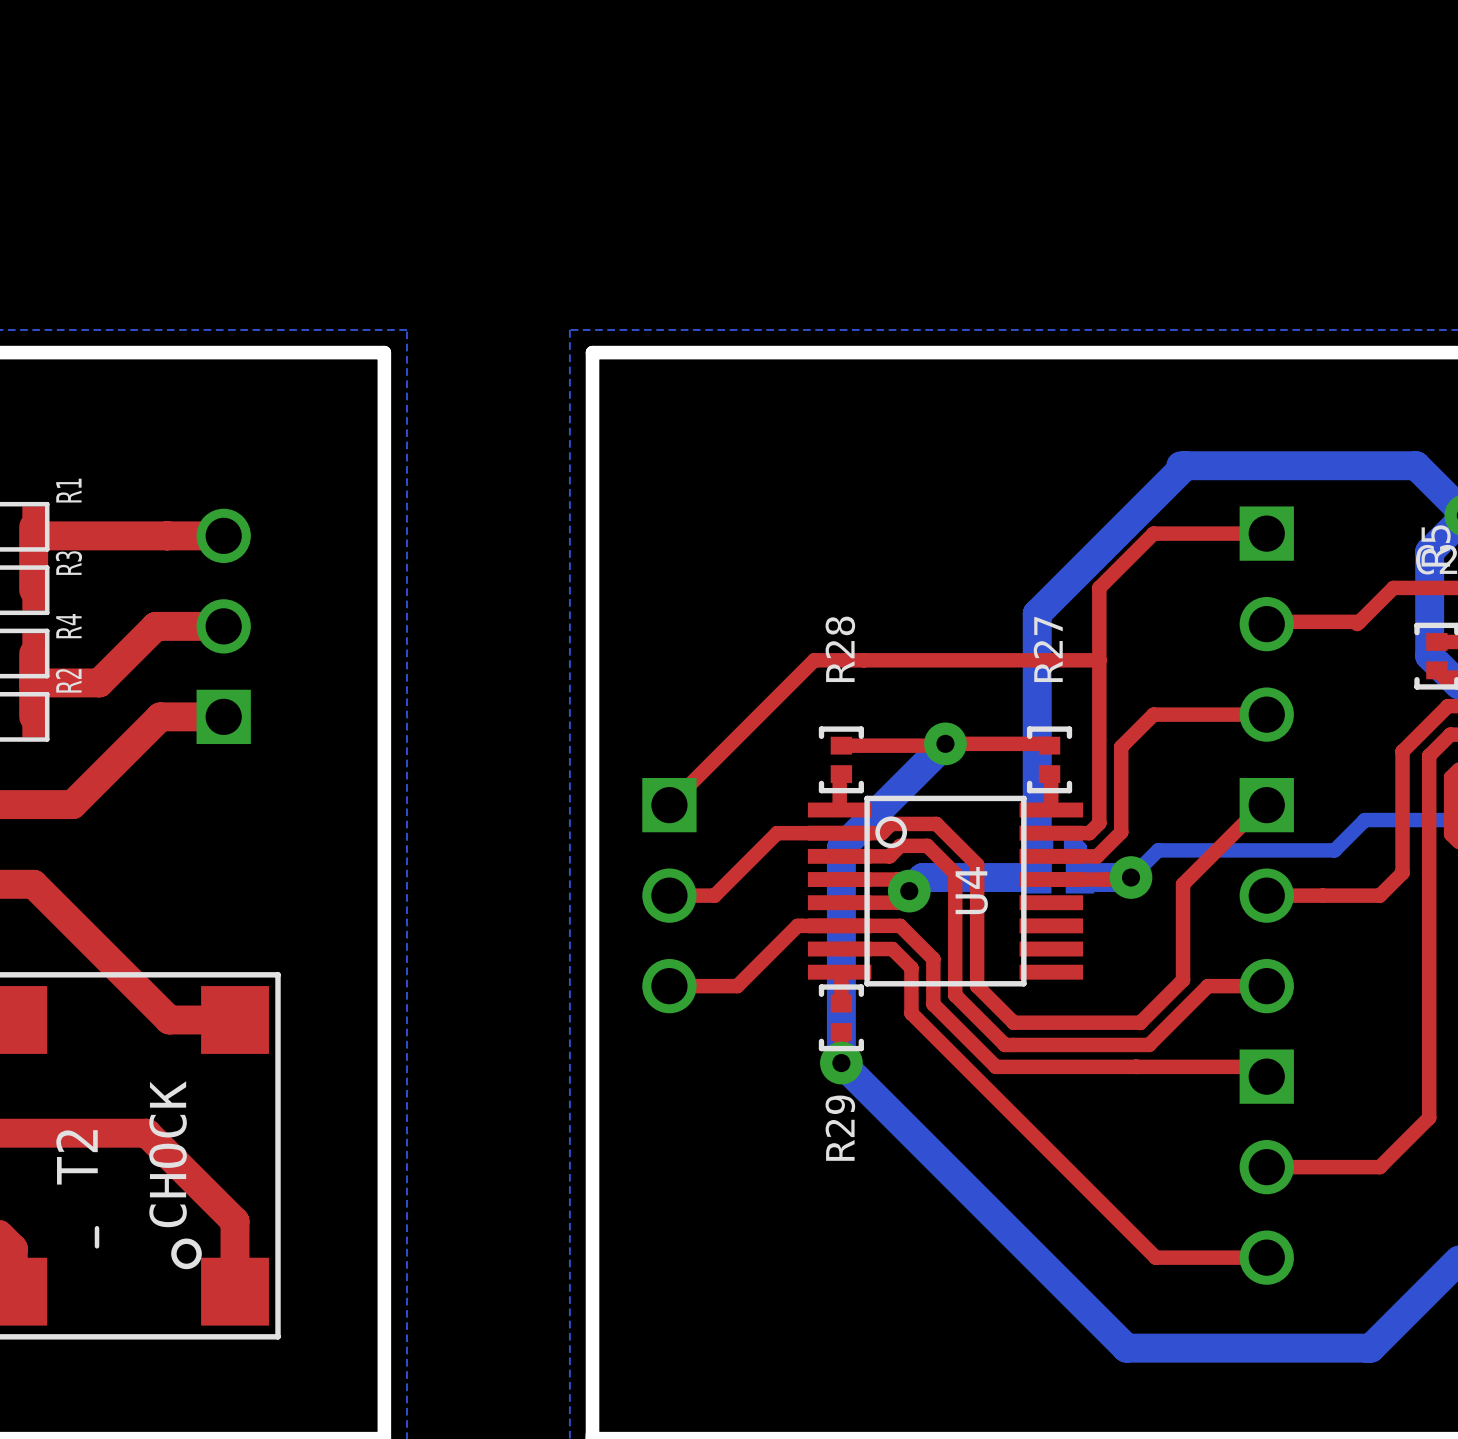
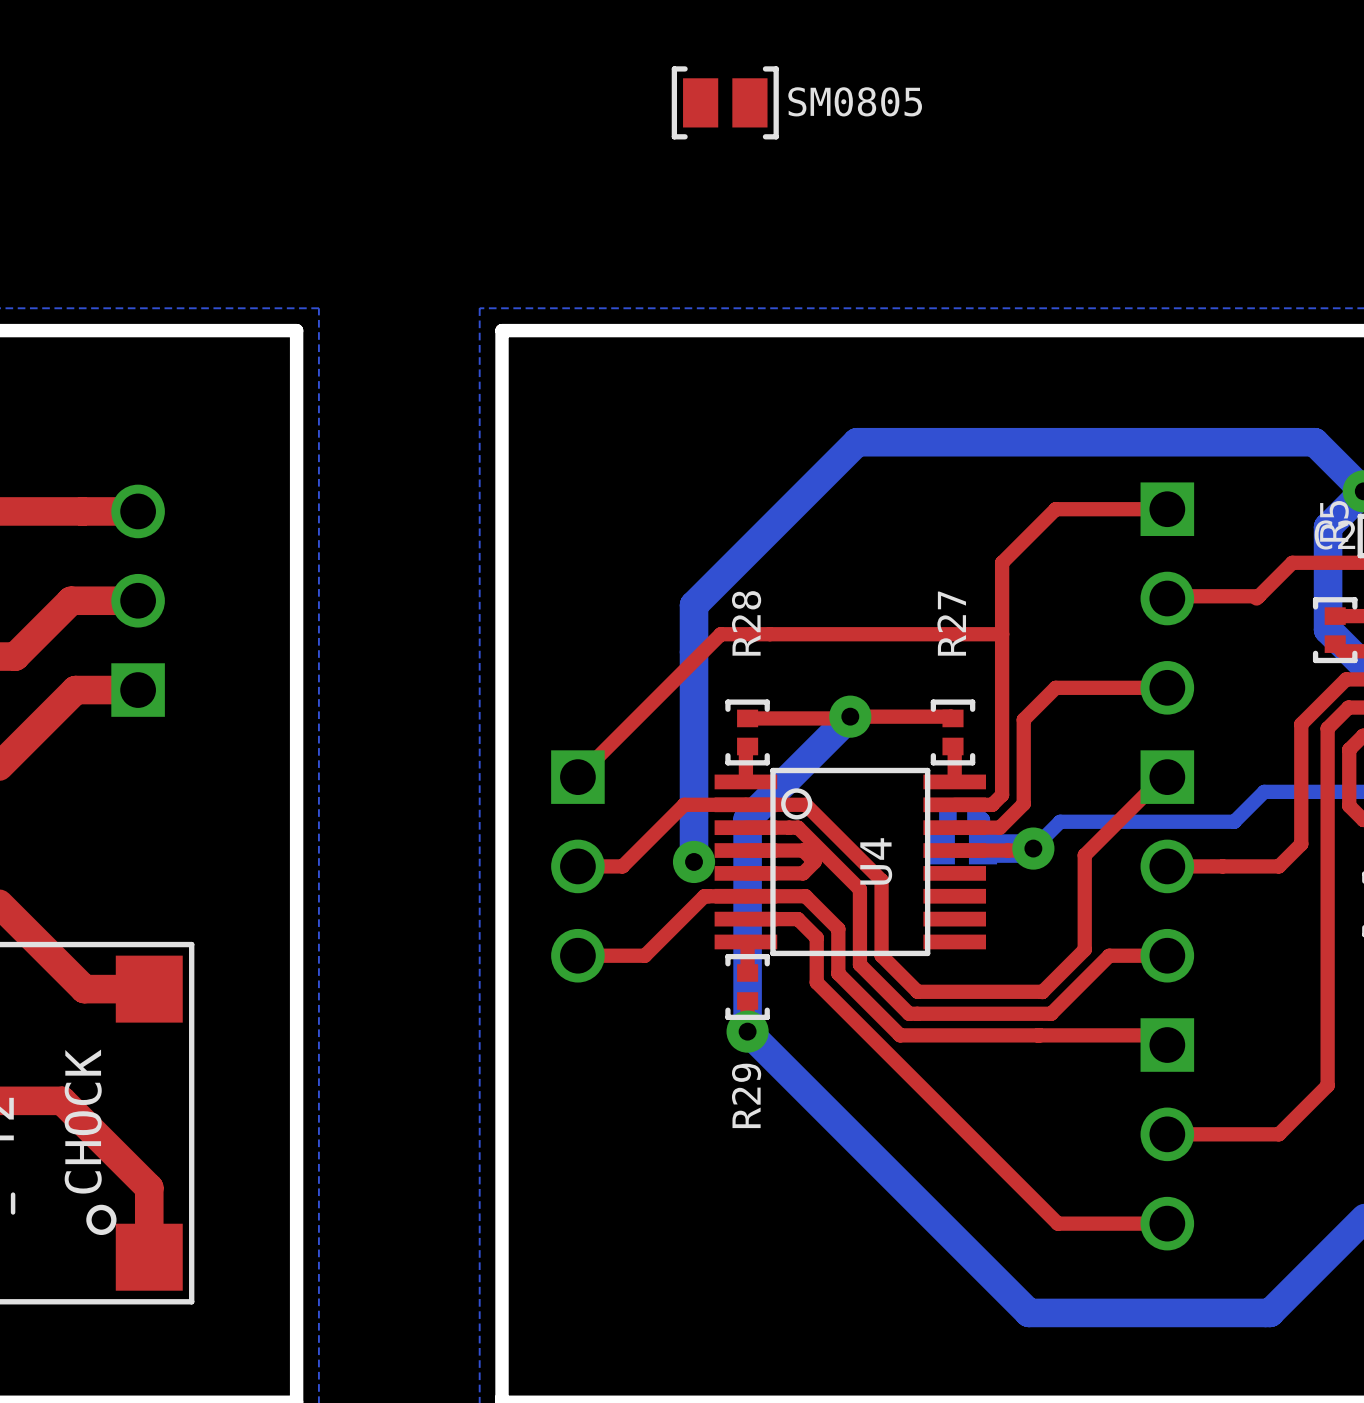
SM0805: none -> (725, 102)
bottom track: none -> (1082, 442) (857, 442) (694, 605) (694, 861)
bottom track: (1185, 465) (1037, 613) (1037, 877) (922, 877) (909, 891) -> none
top track: (881, 833) (891, 823) (936, 823) (977, 864) (977, 909) -> (787, 804) (805, 804) (881, 880)
top track: (889, 856) (900, 845) (927, 845) (955, 873) (955, 918) -> (795, 827) (798, 827) (859, 889)
via position: (909, 891) -> (694, 861)

